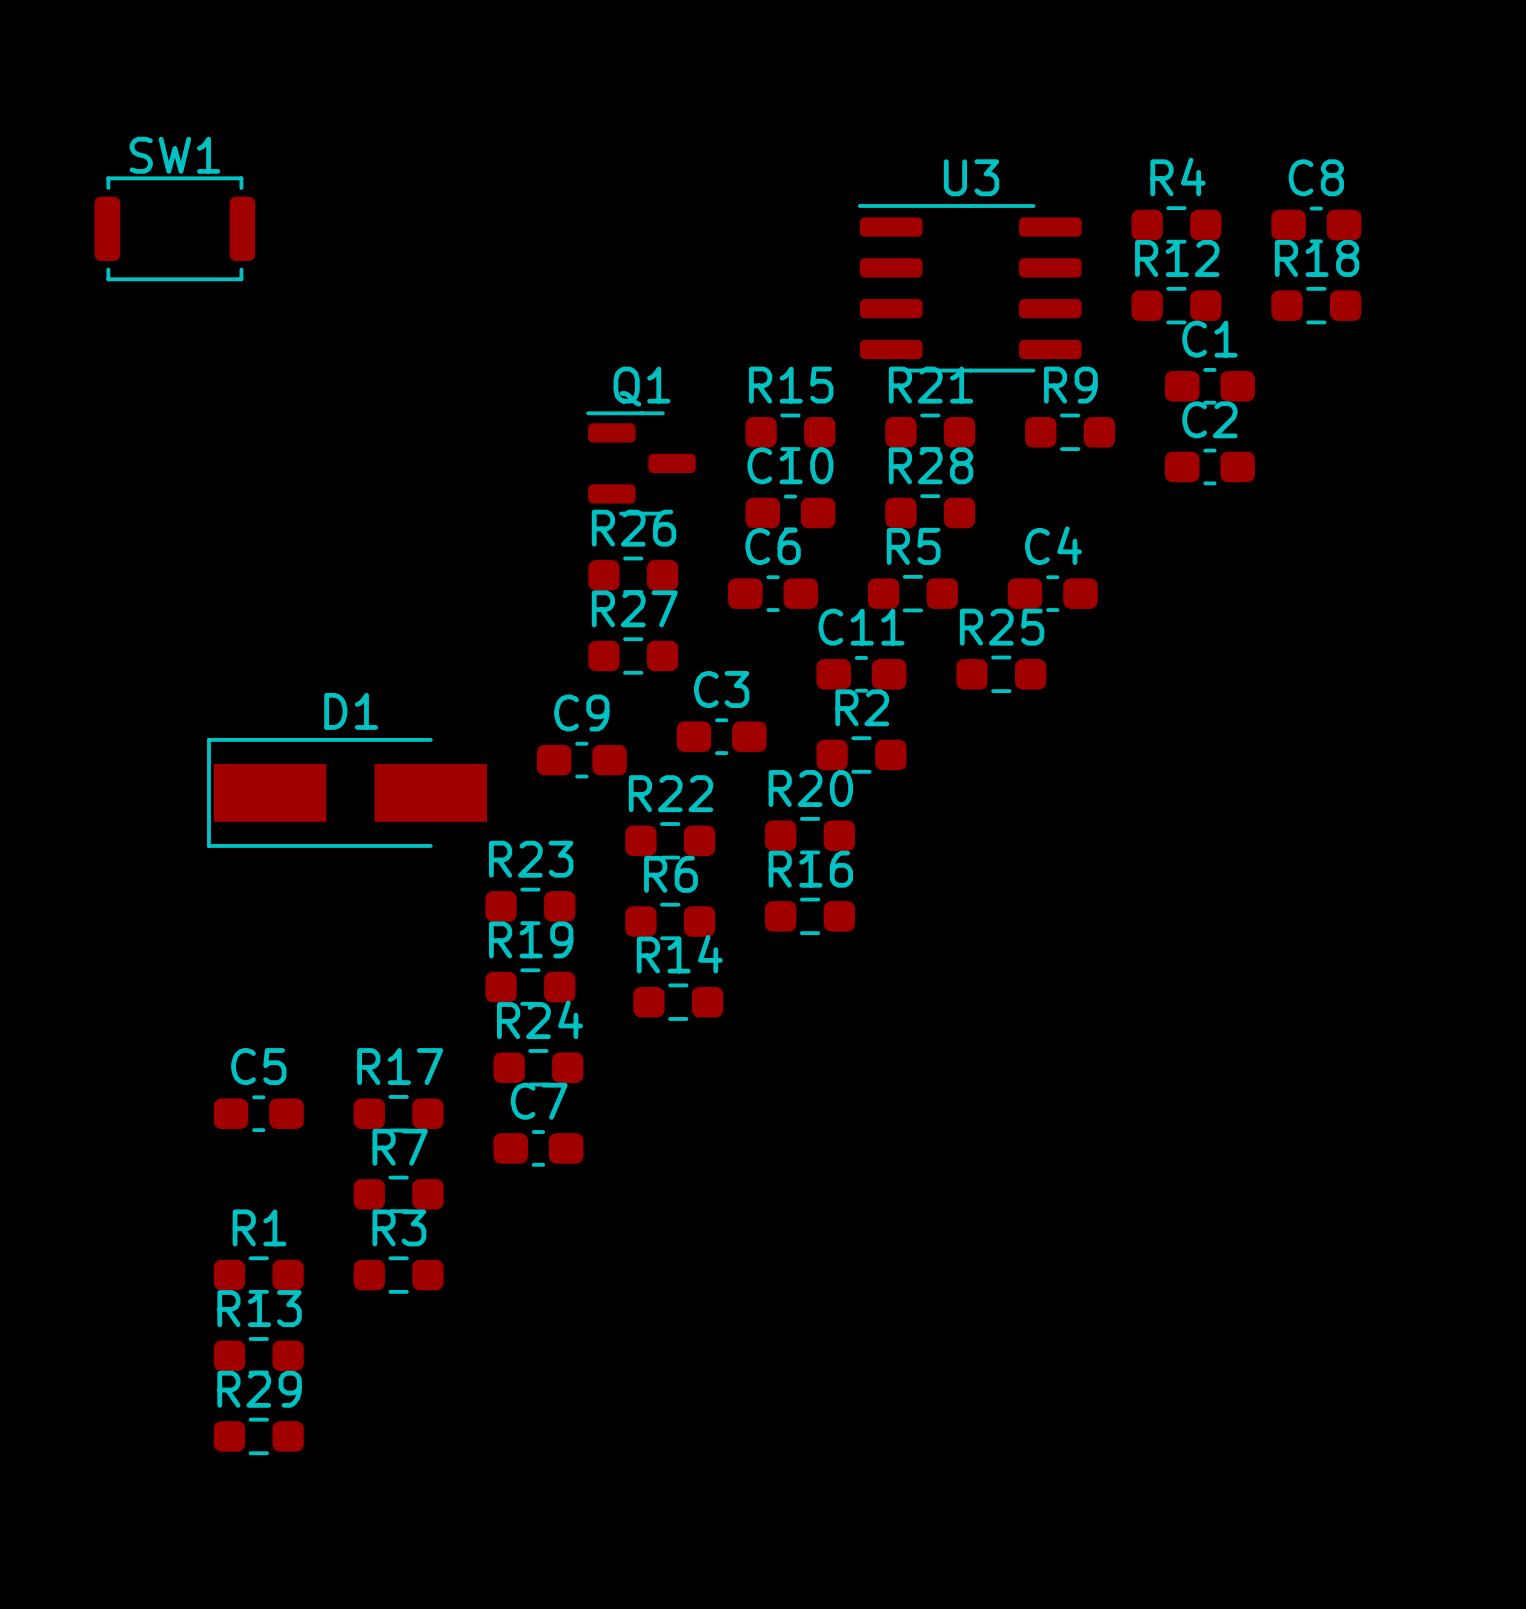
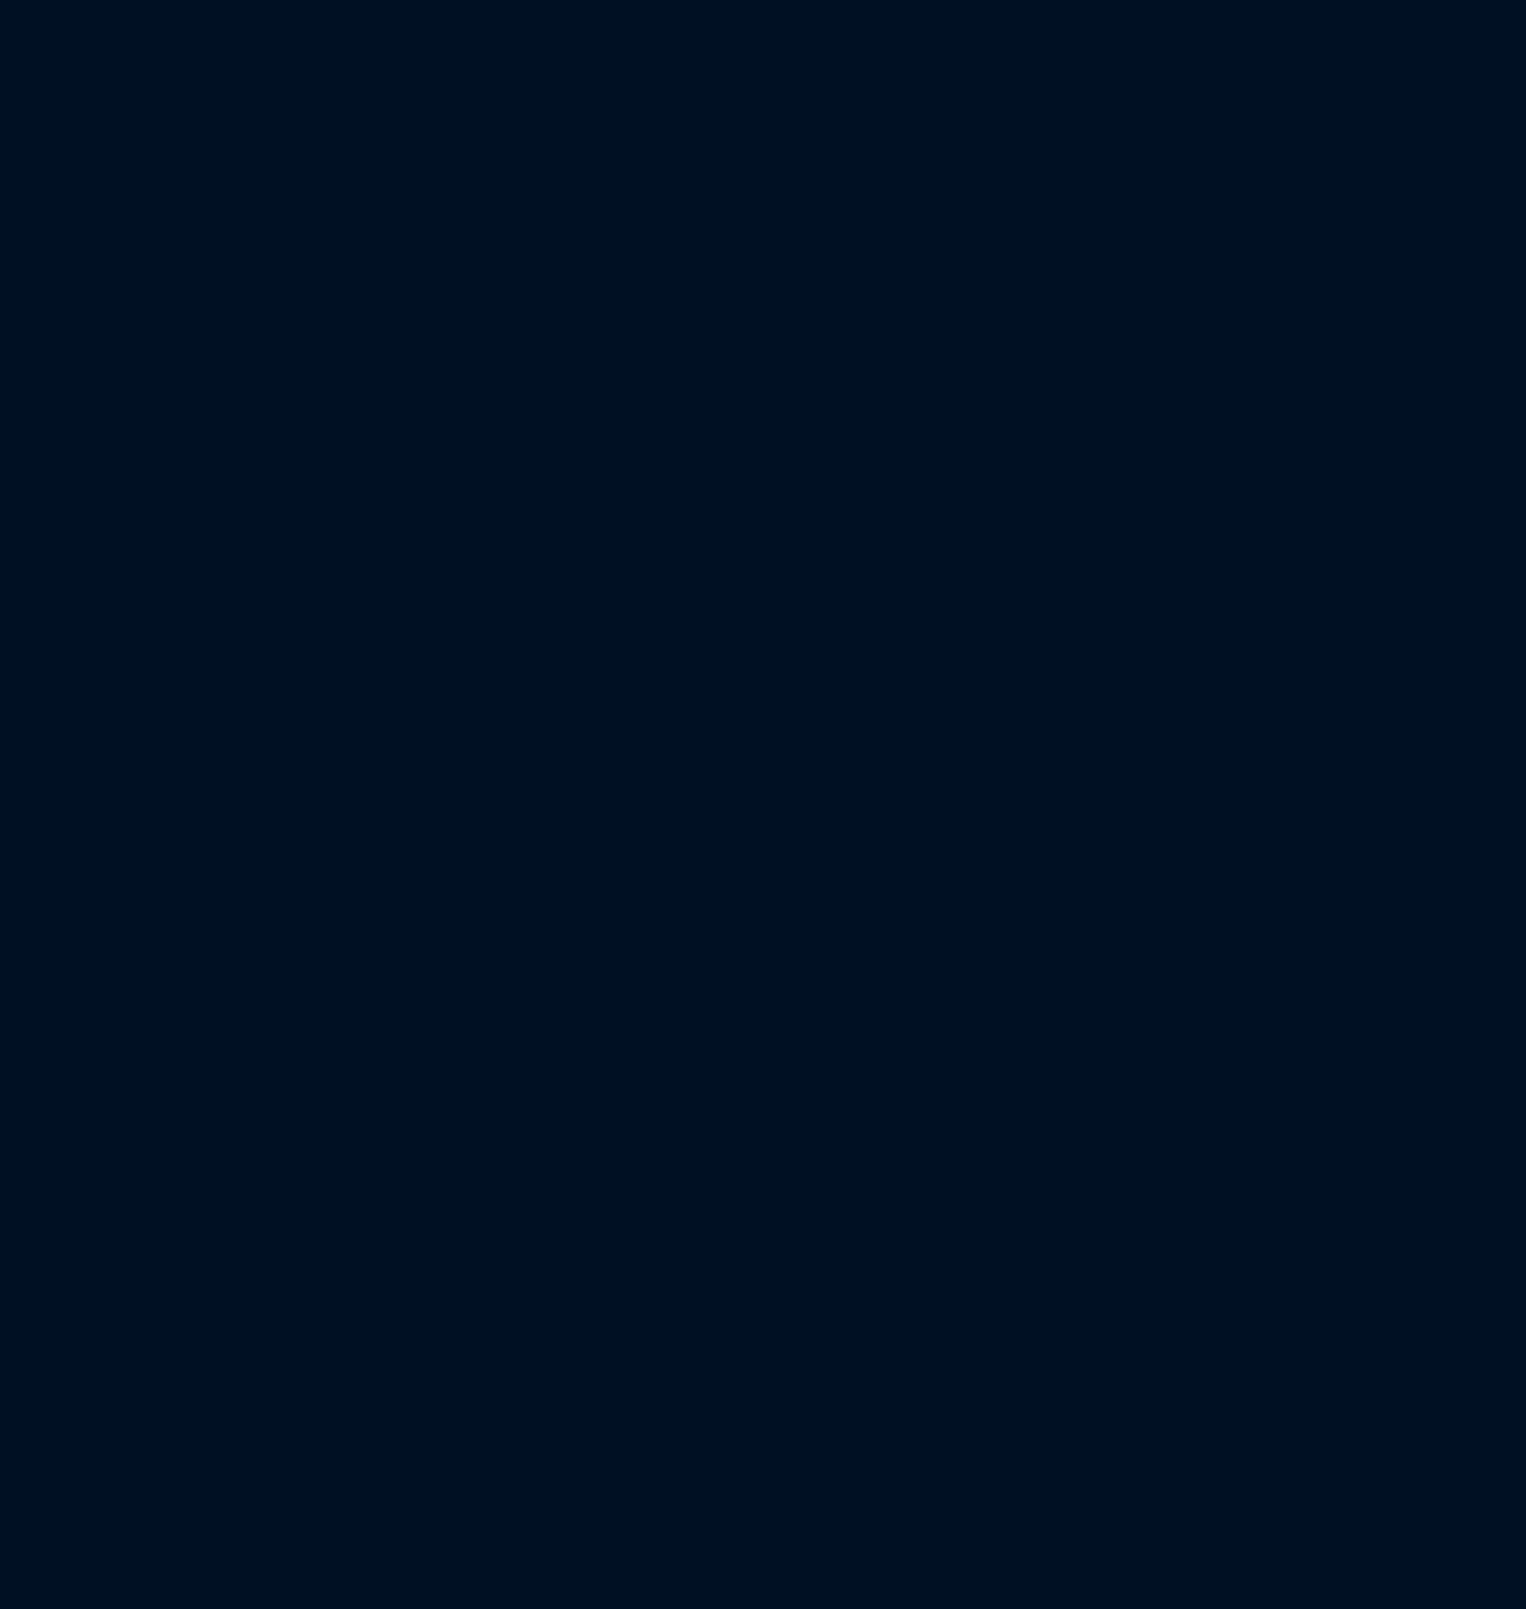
R4: (1176, 224) -> none
C8: (1316, 224) -> none
SW1: (174, 228) -> none
U3: (969, 288) -> none
R12: (1176, 305) -> none
R18: (1316, 305) -> none
C1: (1209, 386) -> none
R15: (790, 432) -> none
R21: (930, 432) -> none
R9: (1070, 432) -> none
Q1: (640, 463) -> none
C2: (1209, 466) -> none
C10: (790, 512) -> none
R28: (930, 512) -> none
R26: (633, 575) -> none
C6: (773, 593) -> none
R5: (912, 593) -> none
C4: (1052, 593) -> none
R27: (633, 655) -> none
C11: (861, 674) -> none
R25: (1001, 674) -> none
C3: (721, 736) -> none
R2: (861, 754) -> none
C9: (581, 760) -> none
D1: (347, 792) -> none
R20: (810, 835) -> none
R22: (670, 840) -> none
R23: (530, 906) -> none
R16: (810, 916) -> none
R6: (670, 921) -> none
R19: (530, 987) -> none
R14: (678, 1002) -> none
R24: (538, 1067) -> none
C5: (258, 1113) -> none
R17: (398, 1113) -> none
C7: (538, 1148) -> none
R7: (398, 1194) -> none
R1: (258, 1275) -> none
R3: (398, 1275) -> none
R13: (258, 1355) -> none
R29: (258, 1436) -> none

